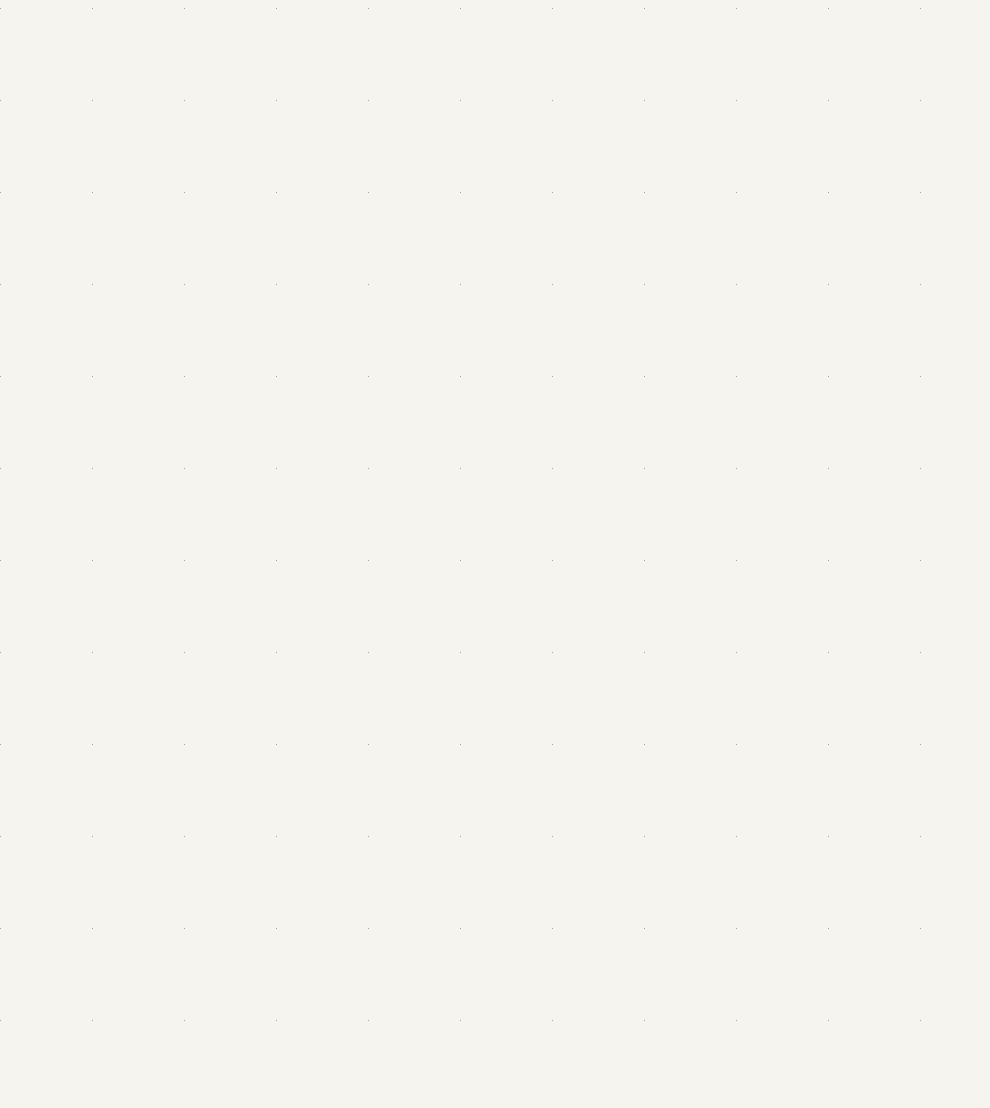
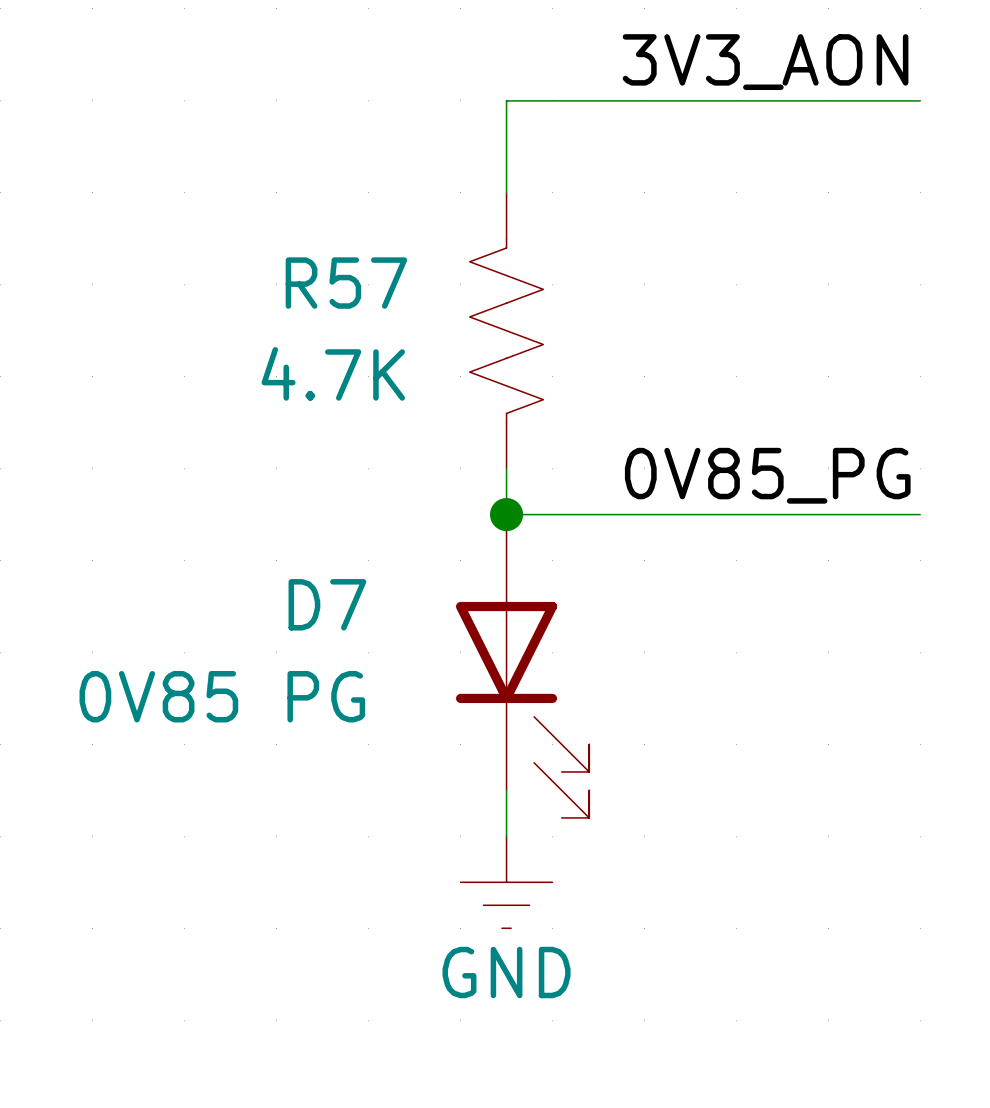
label: none -> 3V3_AON (765, 62)
wire: none -> (920, 100) (506, 100) (506, 192)
R57: none -> 4.7K (506, 330)
wire: none -> (506, 468) (506, 514) (920, 514)
label: none -> 0V85_PG (767, 475)
junction: none -> (506, 514)
D7: none -> 0V85 PG (522, 666)
wire: none -> (506, 790) (506, 836)
power symbol: none -> GND (506, 882)

